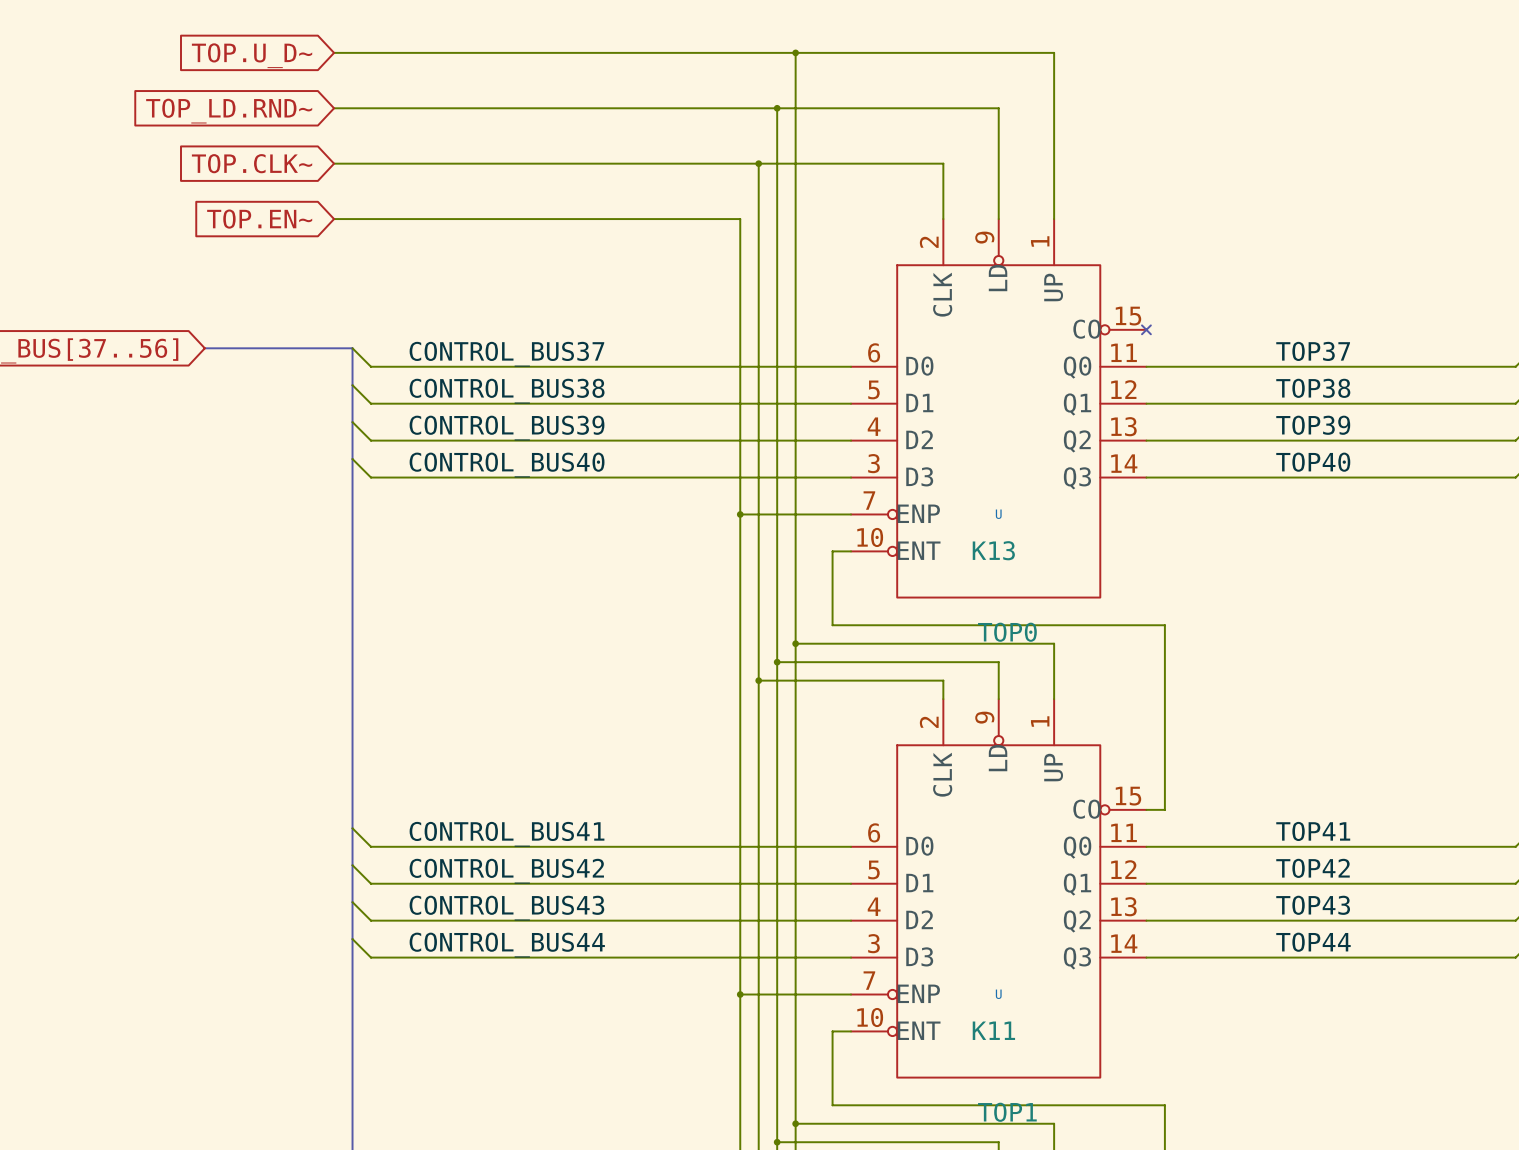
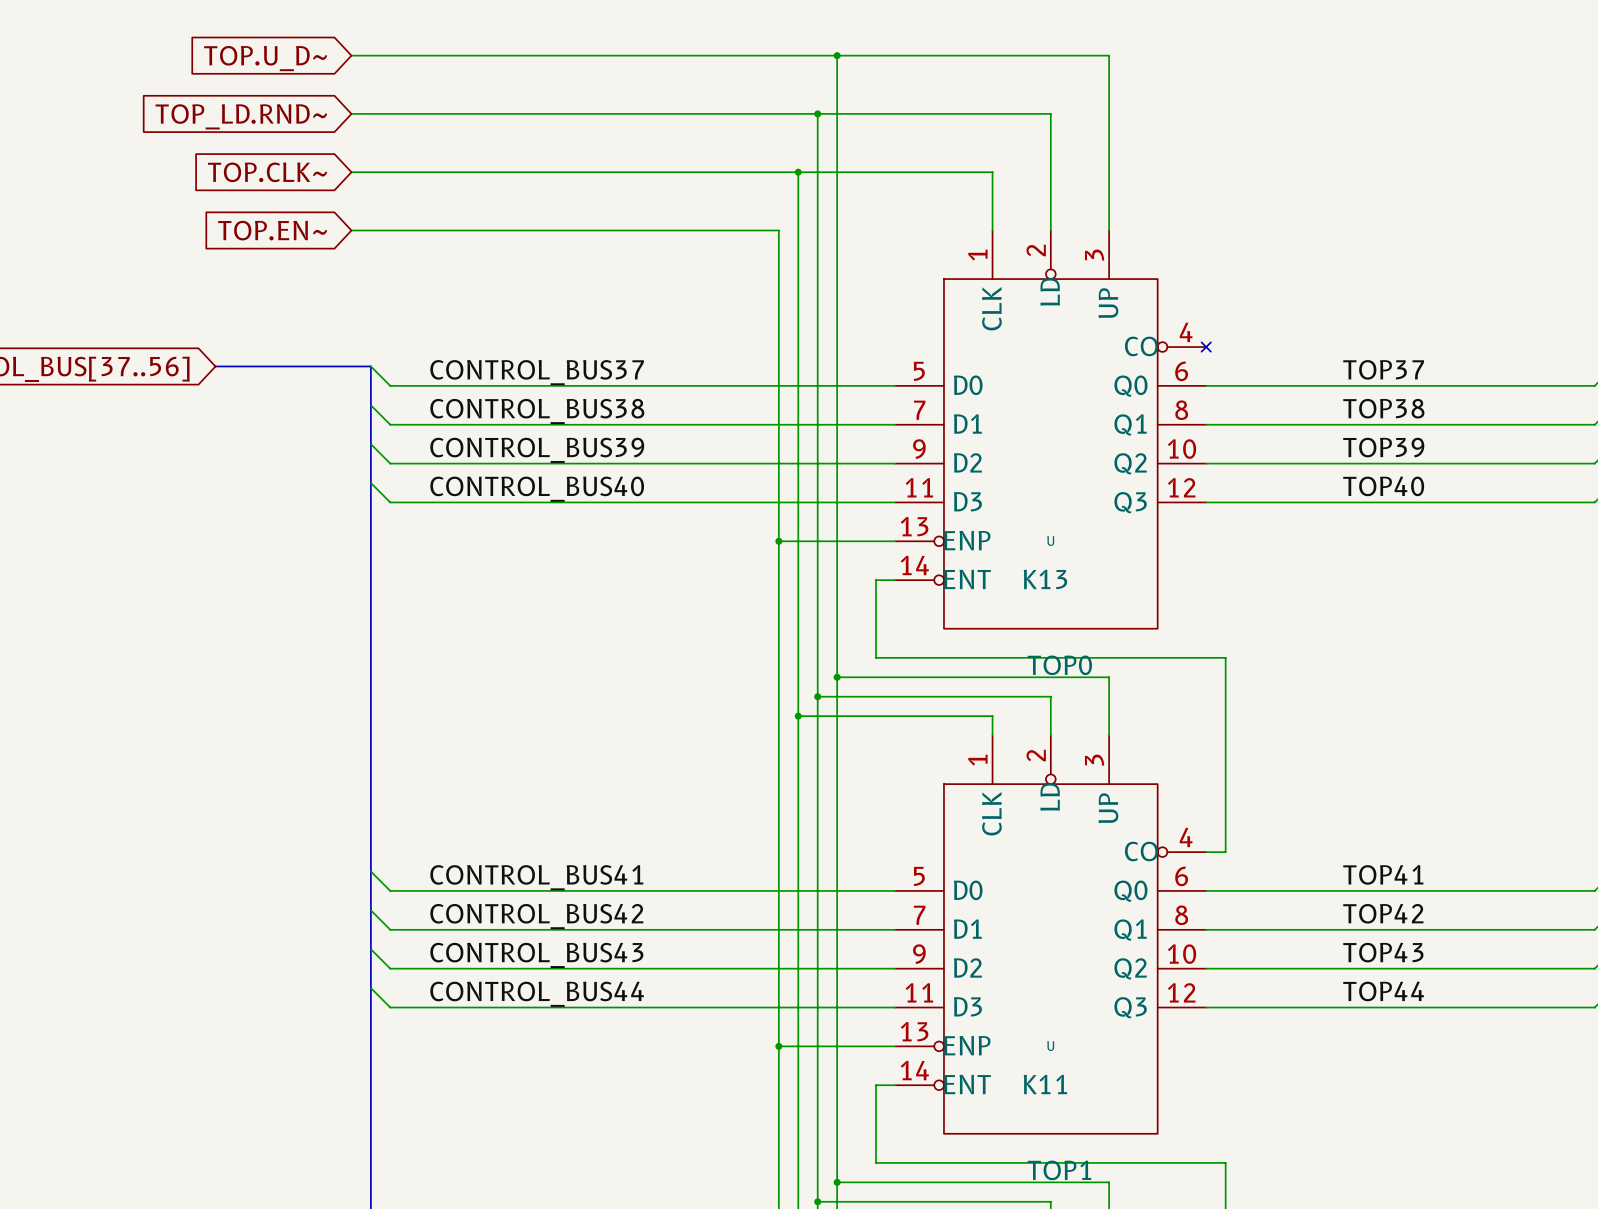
U symbol: [851, 219, 1147, 598] -> [895, 230, 1207, 629]
U symbol: [851, 699, 1147, 1078] -> [895, 735, 1207, 1134]

